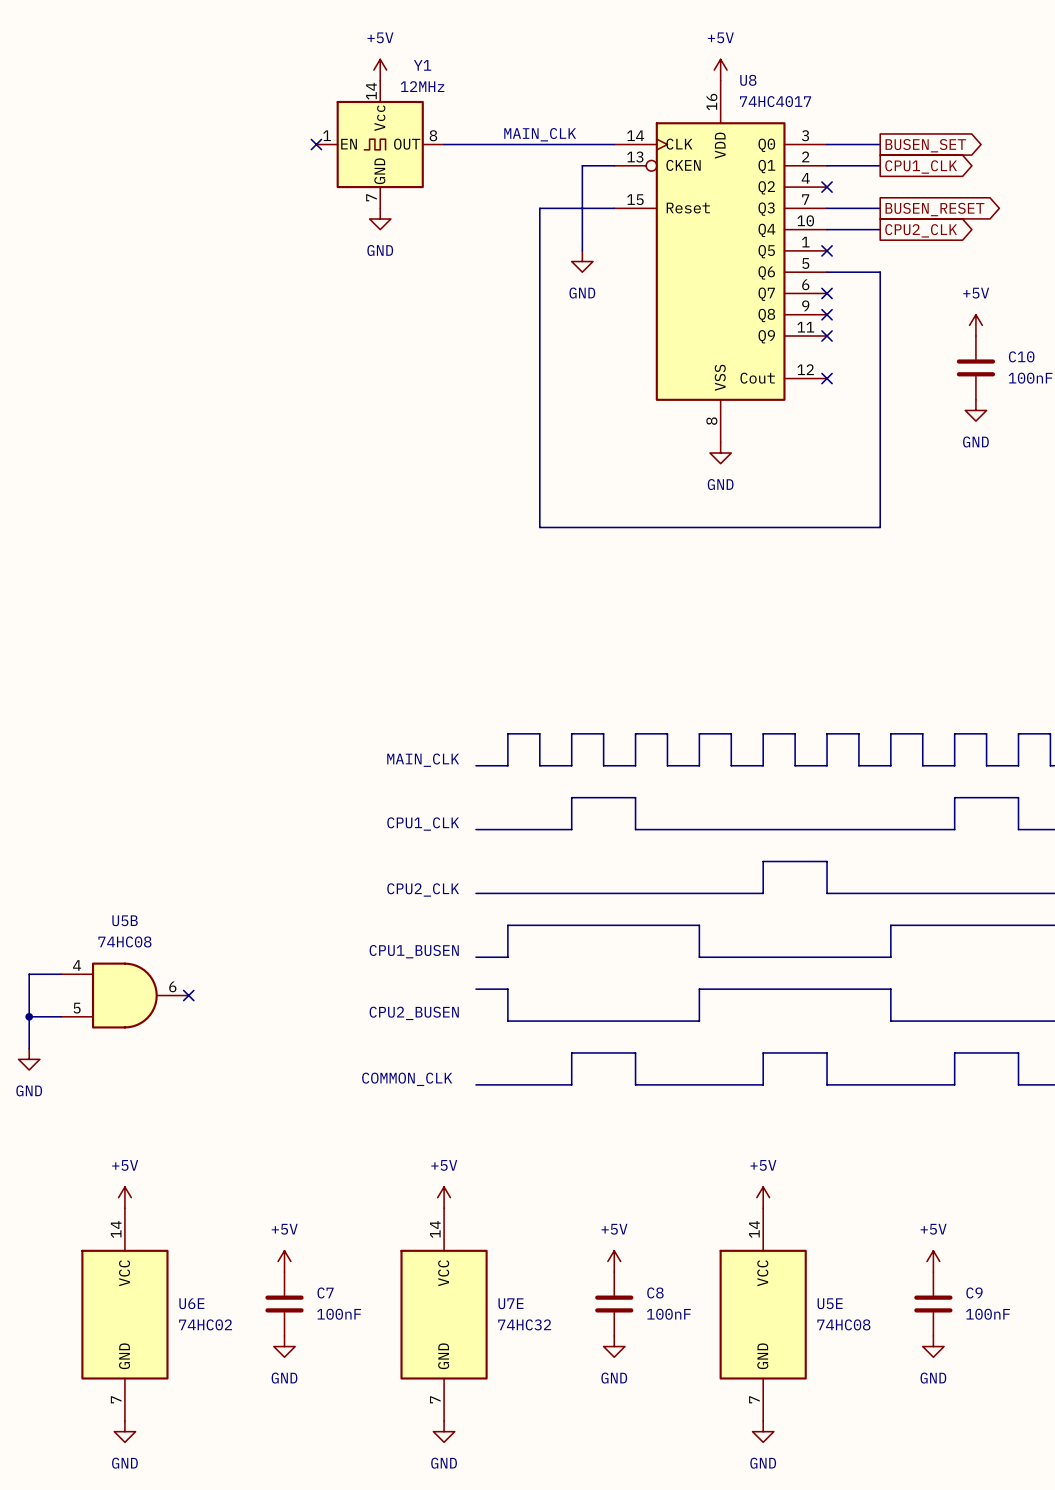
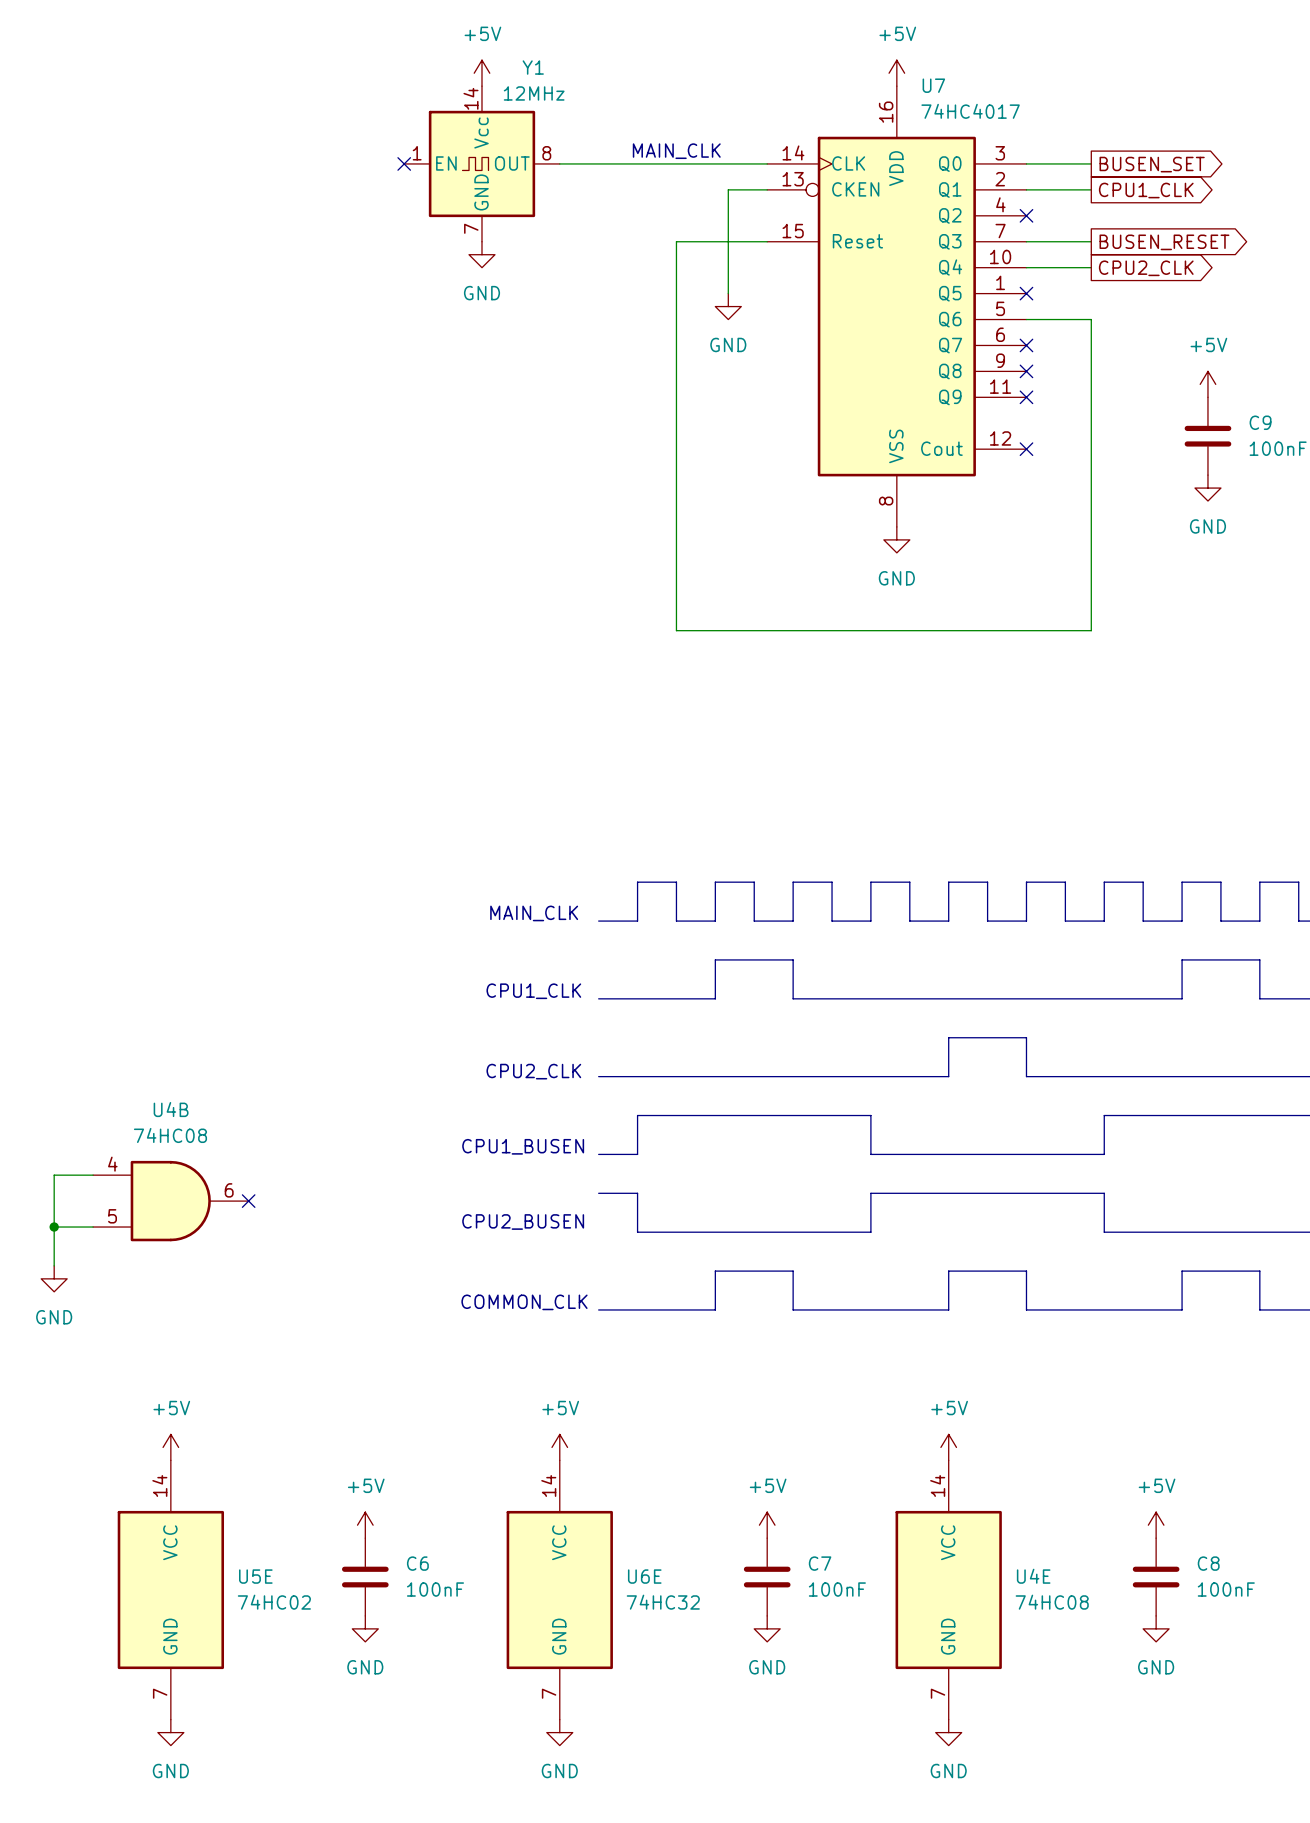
U8 name: U8 (748, 80) -> U7 (933, 85)
C10 name: C10 (1021, 356) -> C9 (1260, 422)
U5B name: U5B (125, 920) -> U4B (171, 1109)
C7 name: C7 (325, 1292) -> C6 (417, 1563)
C8 name: C8 (655, 1292) -> C7 (820, 1563)
C9 name: C9 (974, 1292) -> C8 (1208, 1563)
U6E name: U6E (191, 1303) -> U5E (255, 1576)
U7E name: U7E (510, 1303) -> U6E (644, 1576)
U5E name: U5E (830, 1303) -> U4E (1033, 1576)

